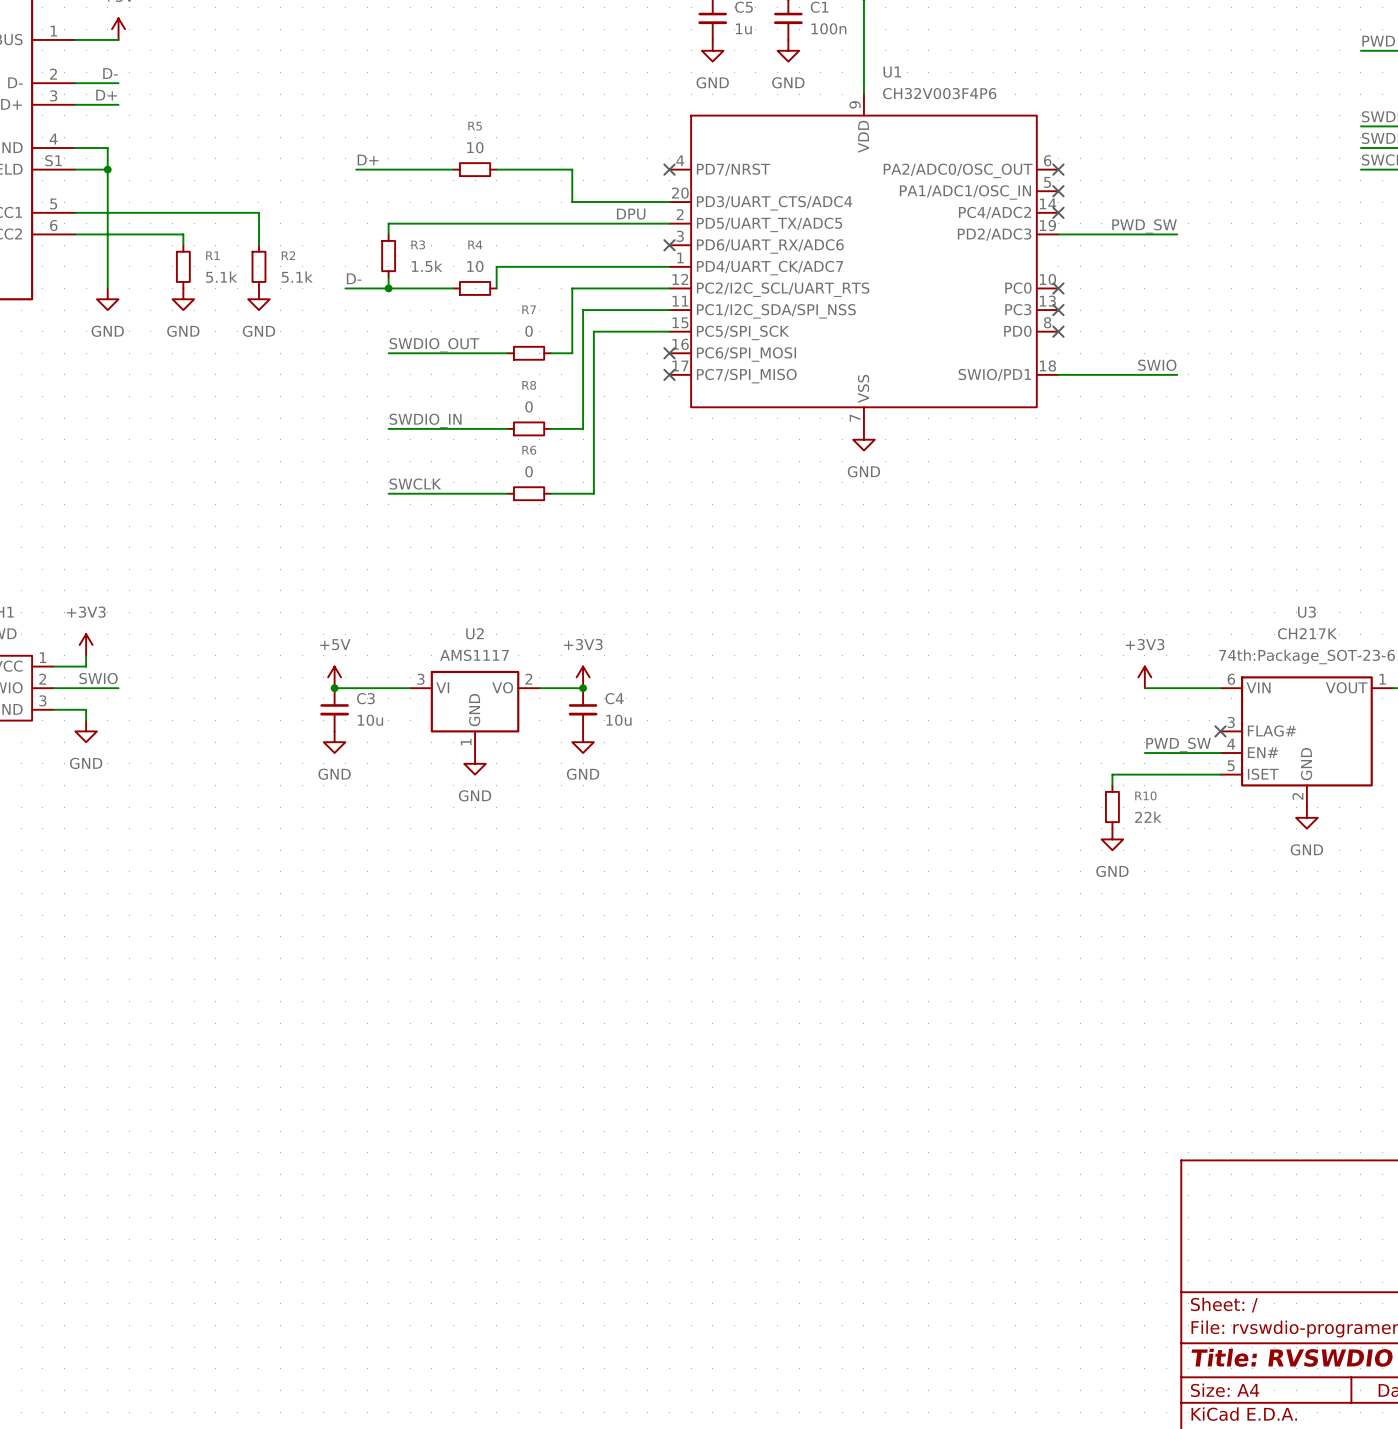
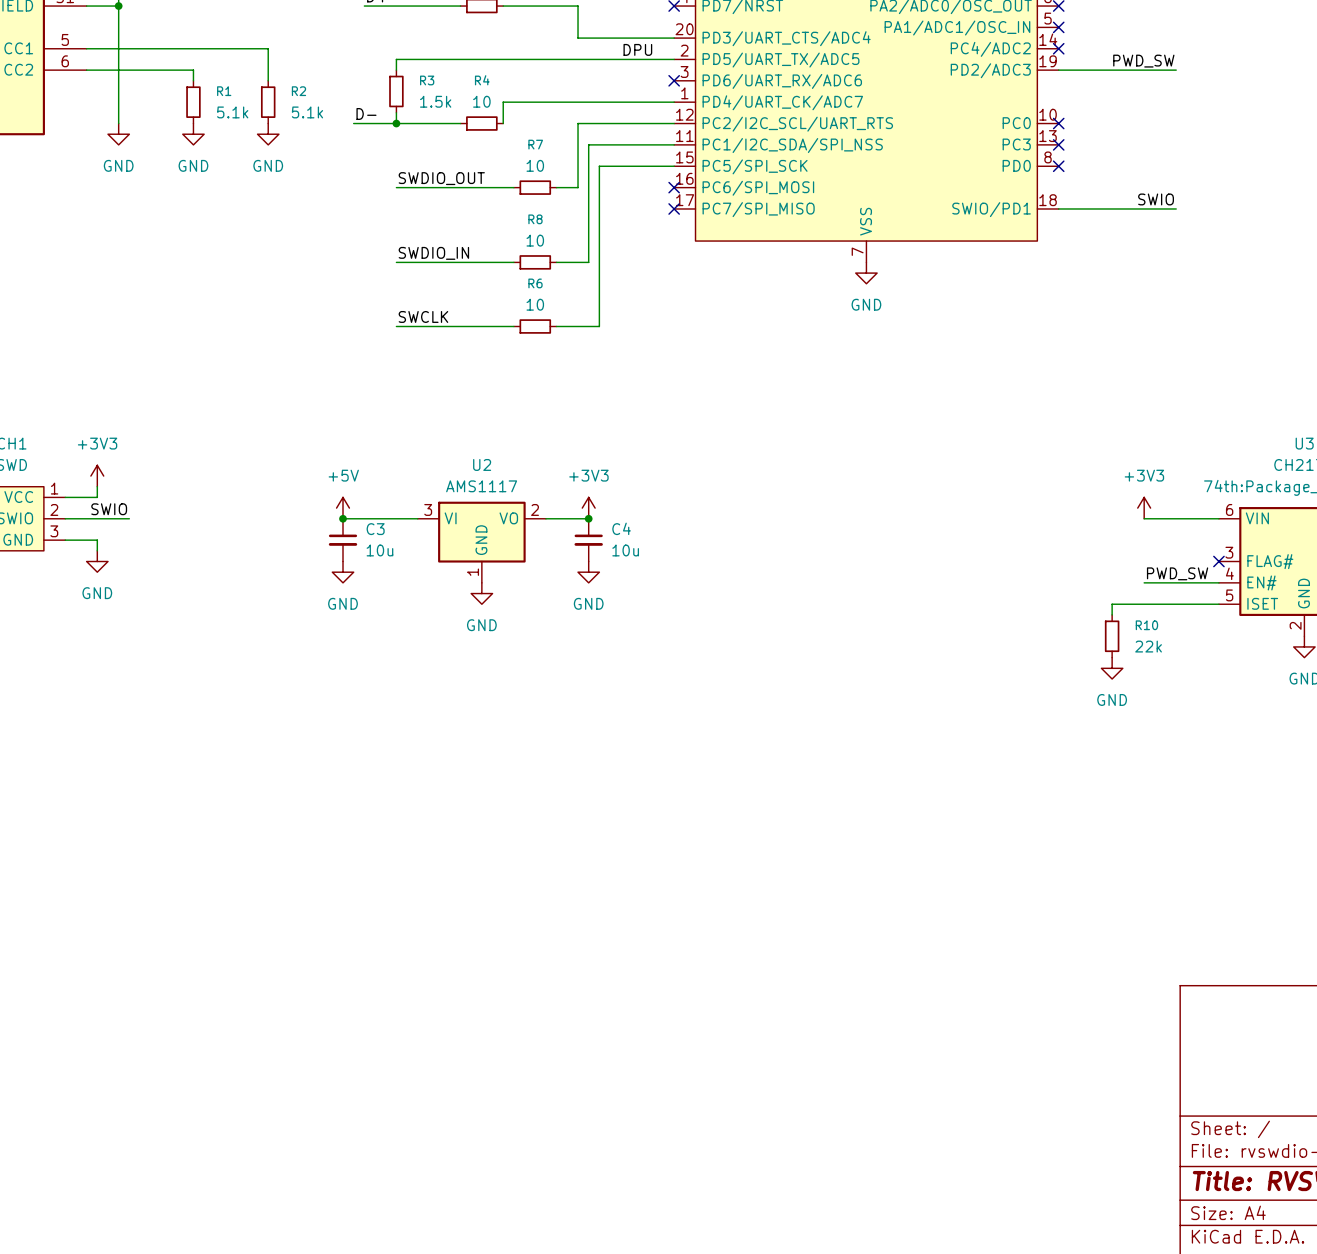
R7 value: 0 (529, 331) -> 10 (535, 165)
R8 value: 0 (529, 406) -> 10 (535, 240)
R6 value: 0 (529, 471) -> 10 (535, 304)

